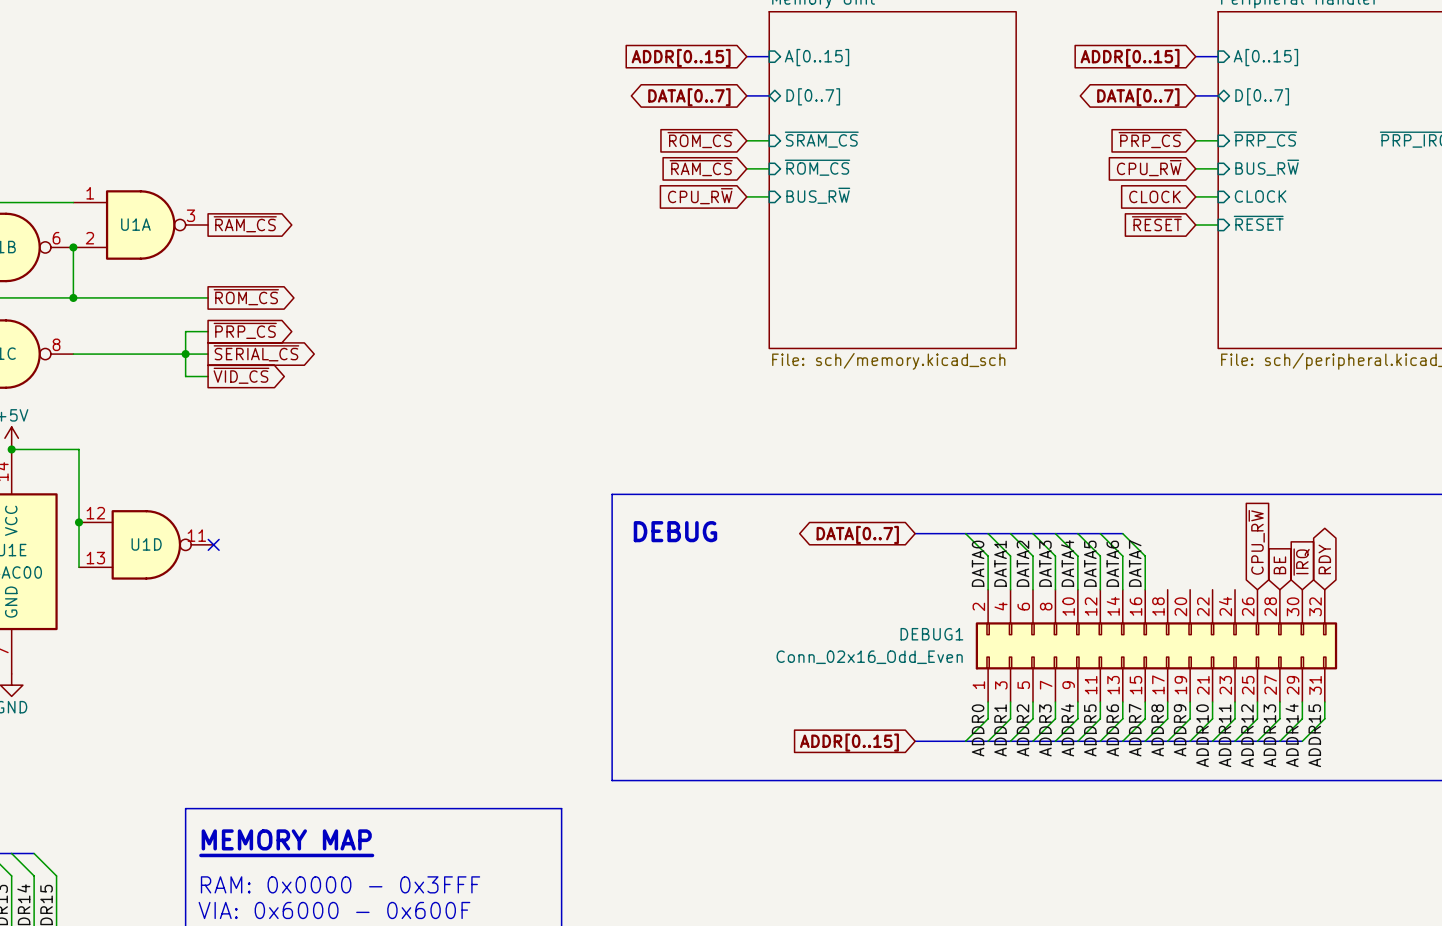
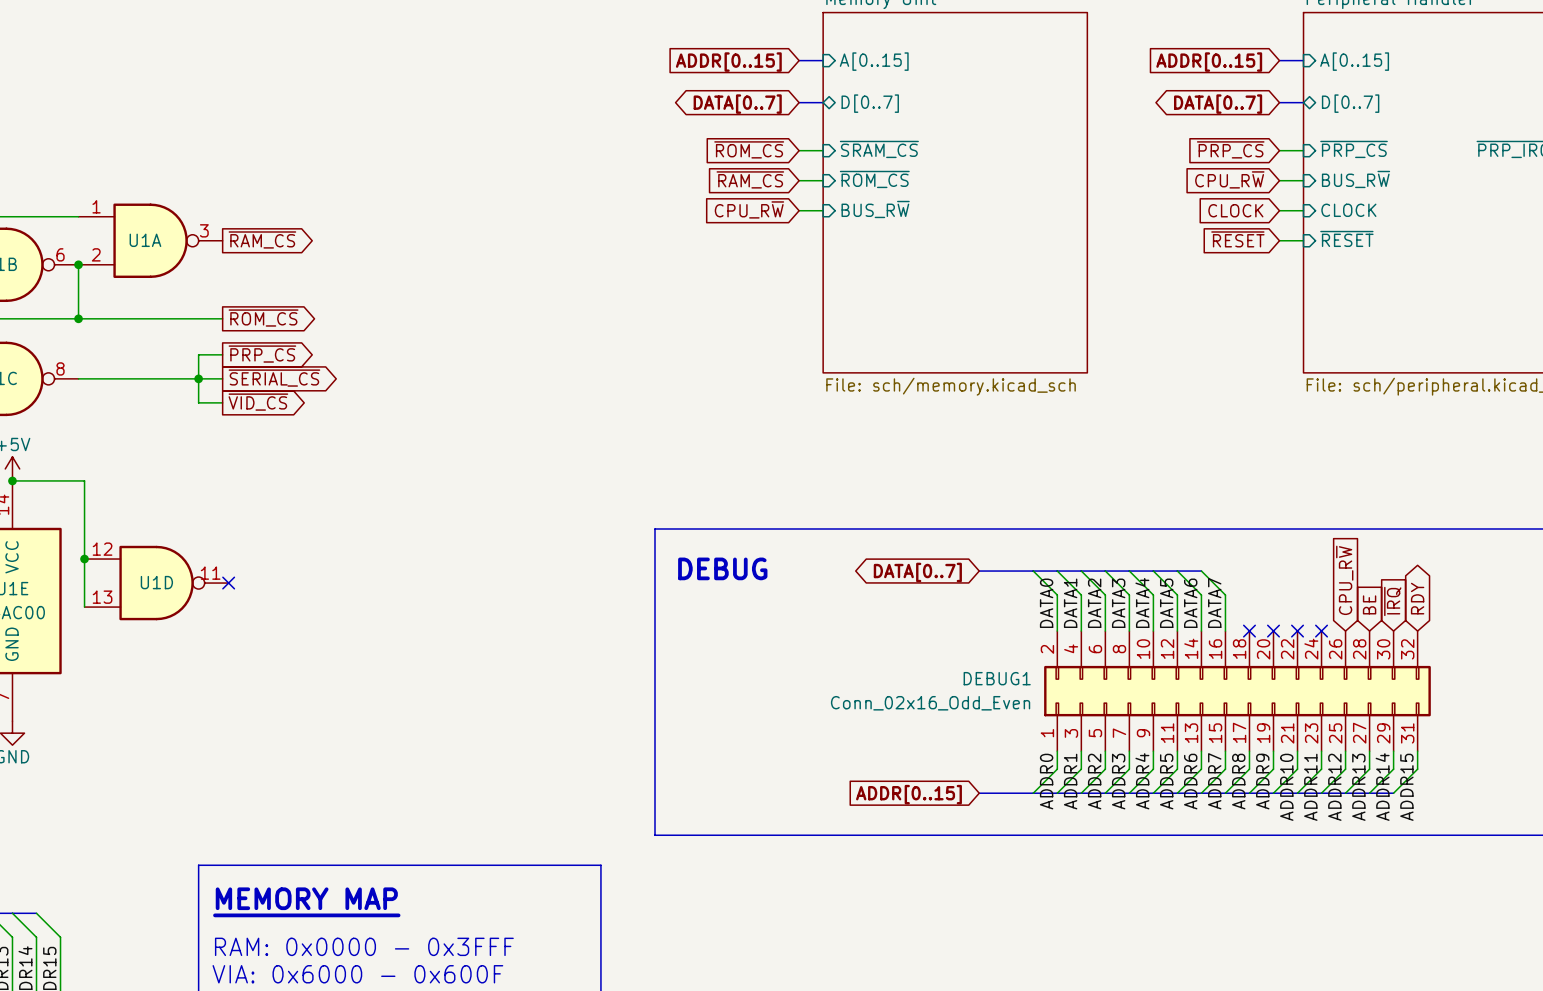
no-connect mark: none -> (1249, 631)
no-connect mark: none -> (1273, 631)
no-connect mark: none -> (1297, 631)
no-connect mark: none -> (1321, 631)

